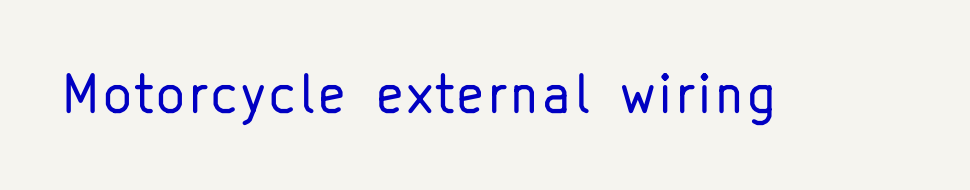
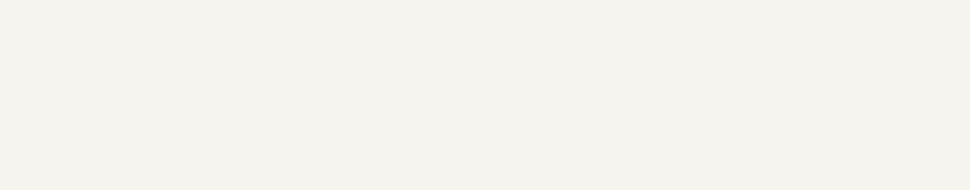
text: Motorcycle external wiring (419, 99) -> none

